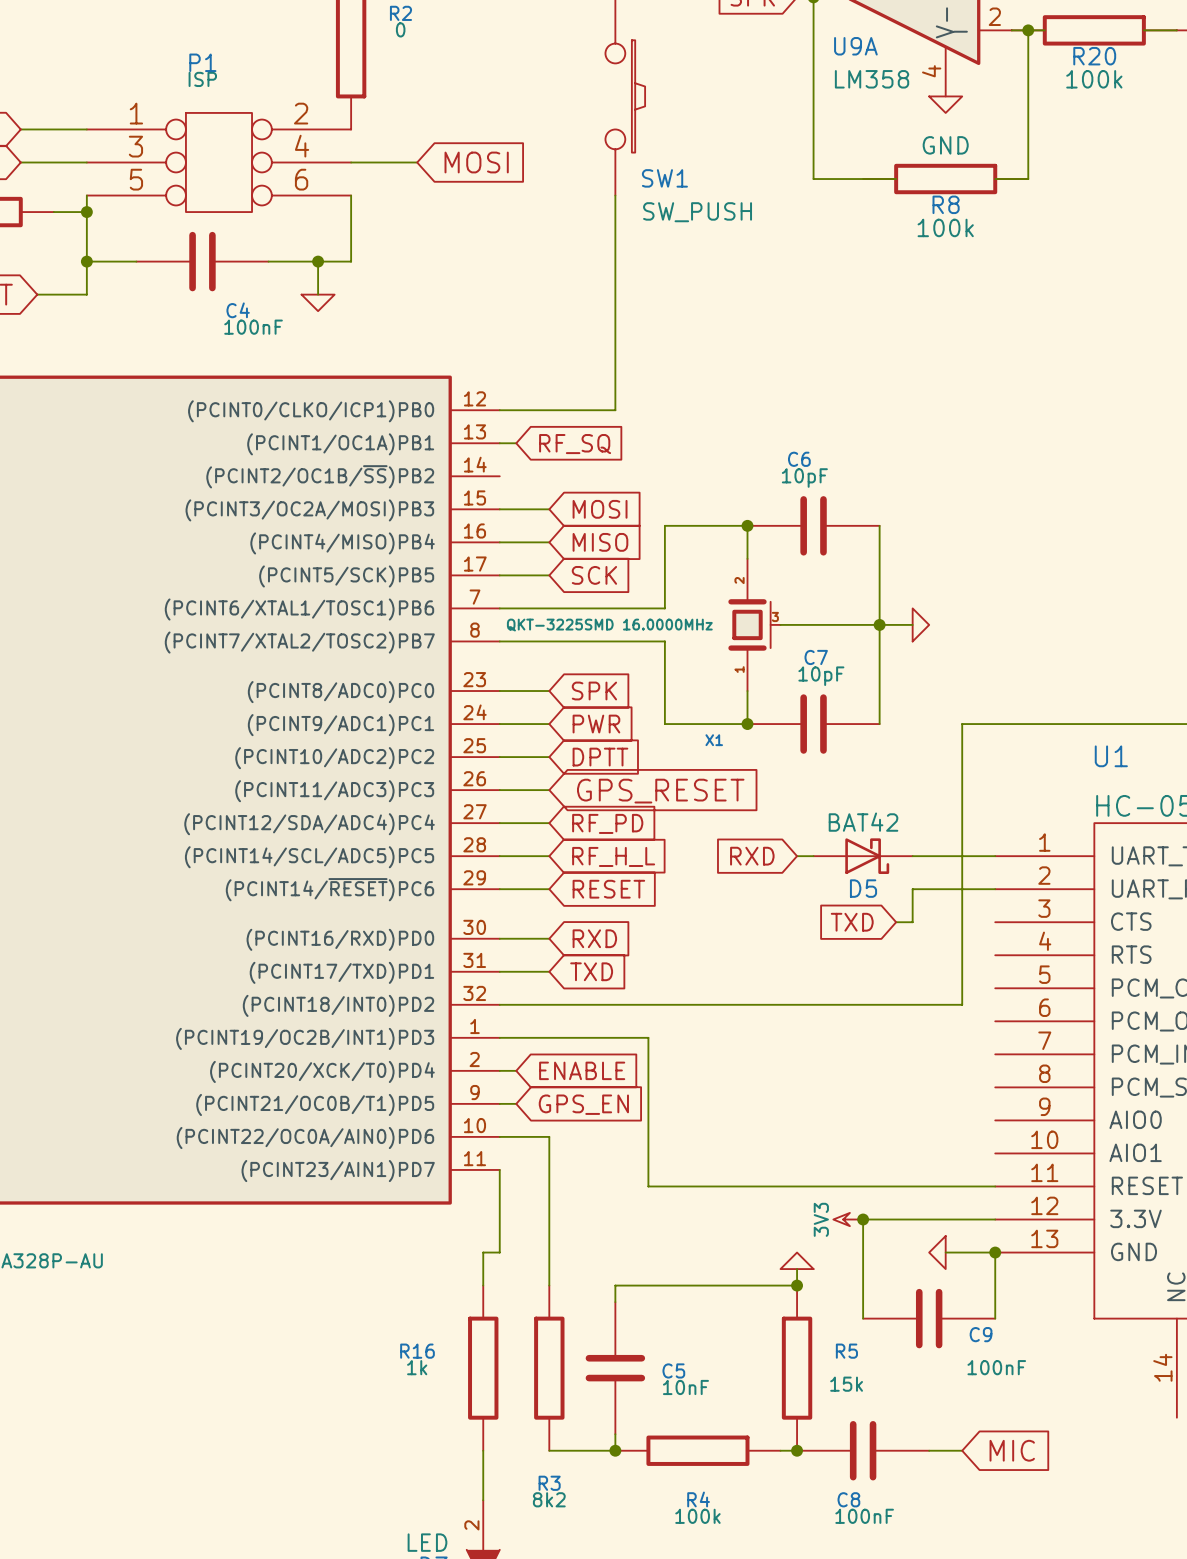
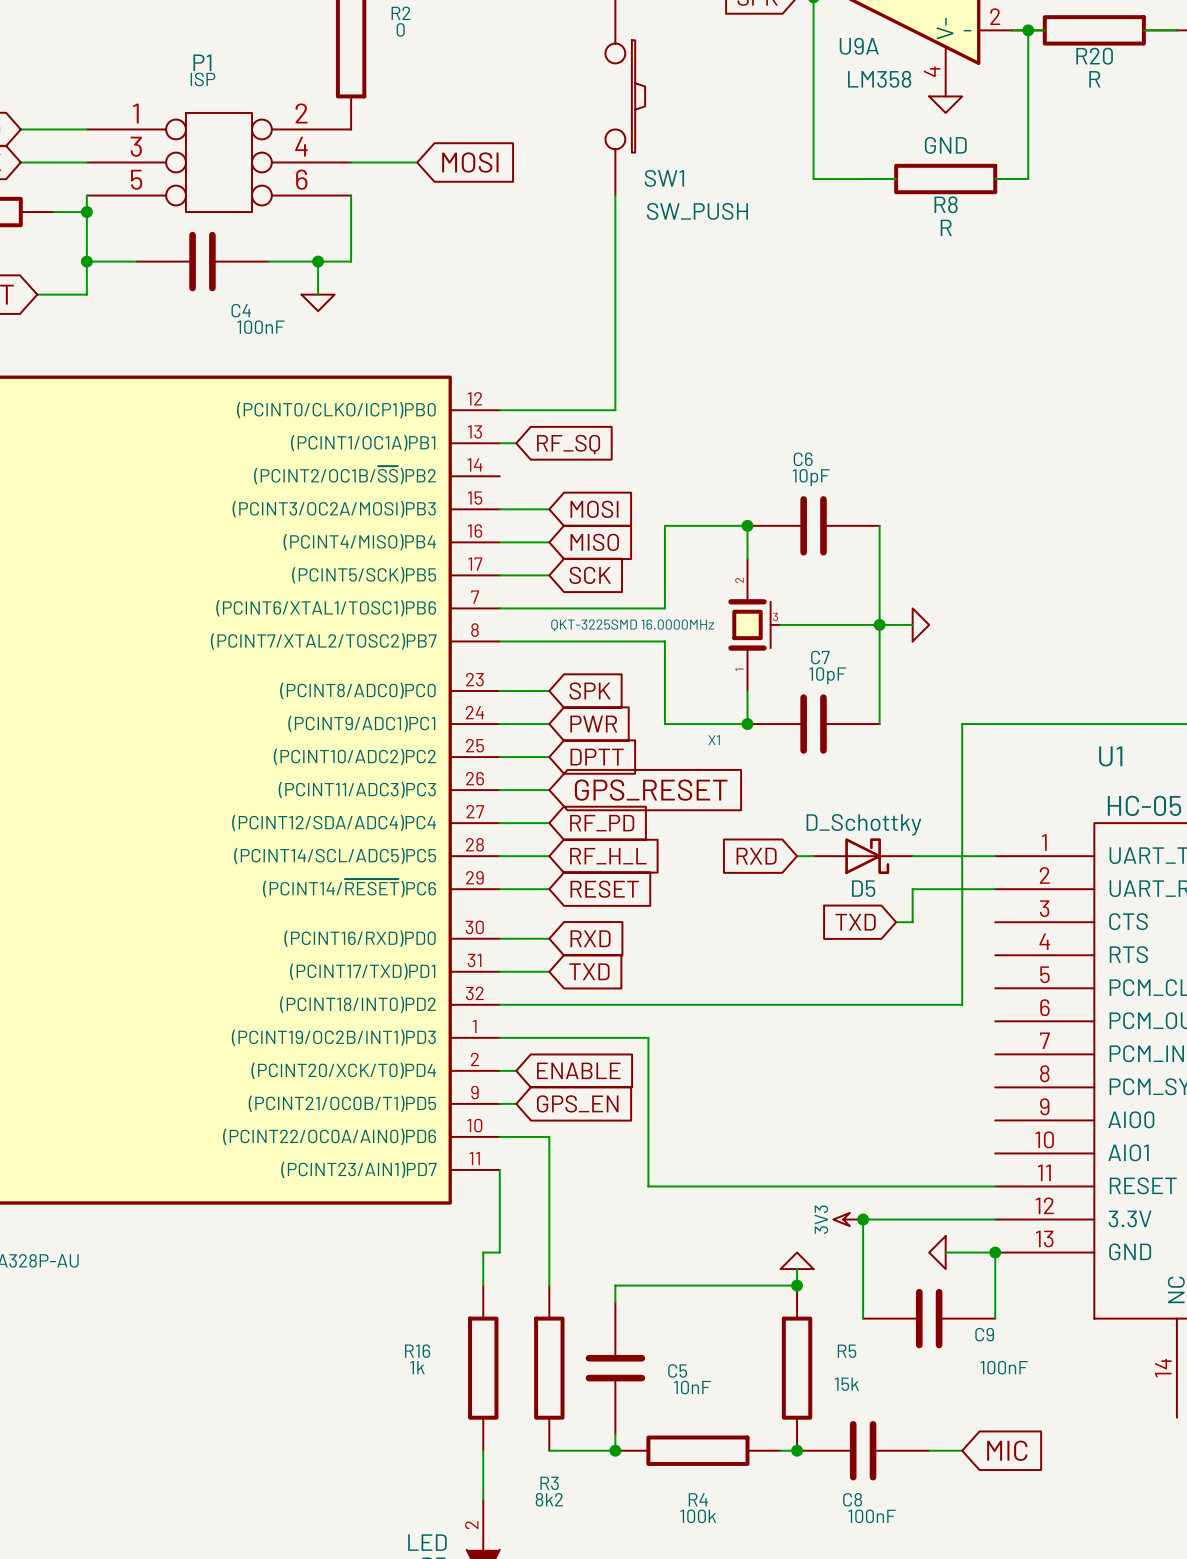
R20 value: 100k (1094, 79) -> R (1094, 79)
R8 value: 100k (945, 227) -> R (946, 227)
D5 value: BAT42 (863, 822) -> D_Schottky (863, 824)

